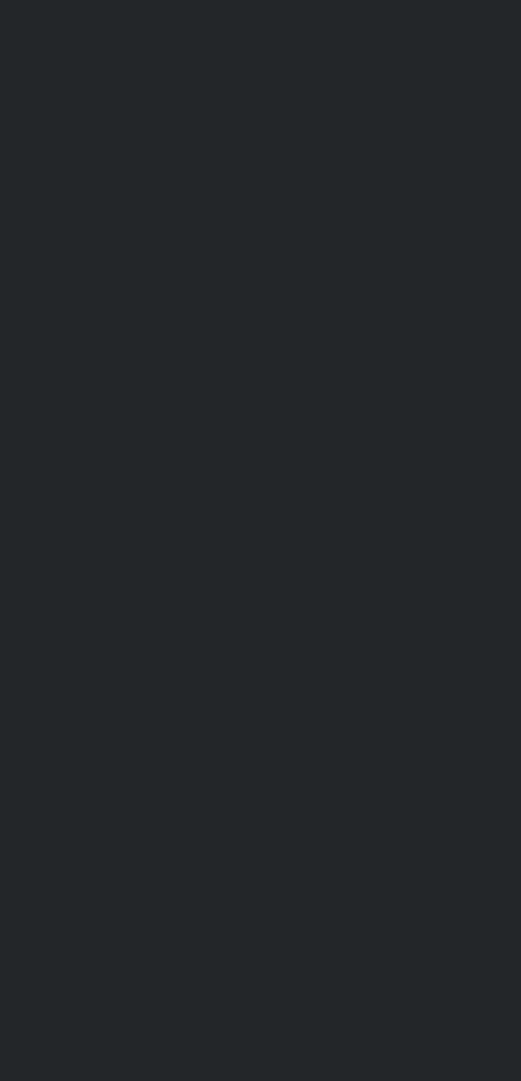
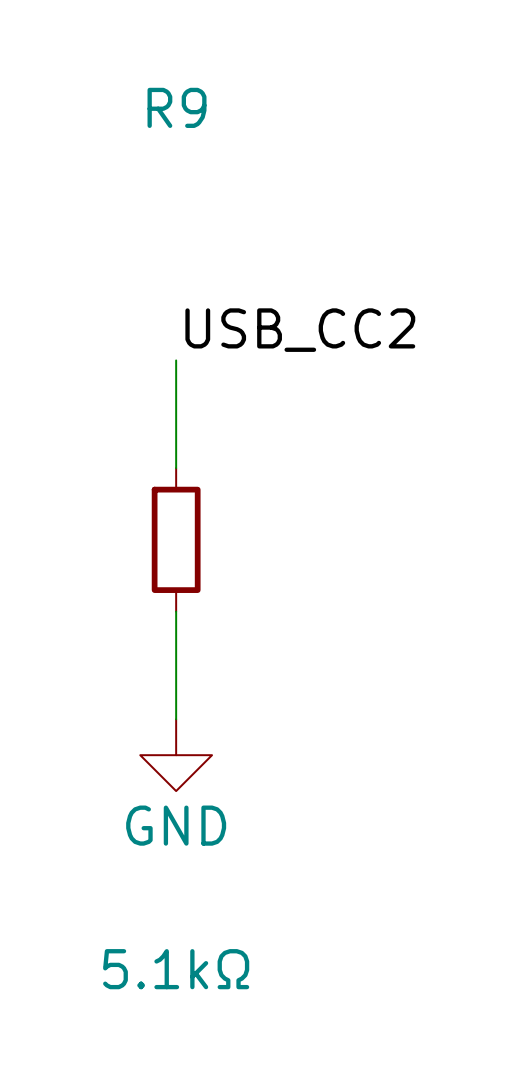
label: none -> USB_CC2 (300, 330)
wire: none -> (176, 360) (176, 468)
R9: none -> 5.1kΩ (176, 539)
wire: none -> (176, 611) (176, 719)
power symbol: none -> GND (176, 755)

